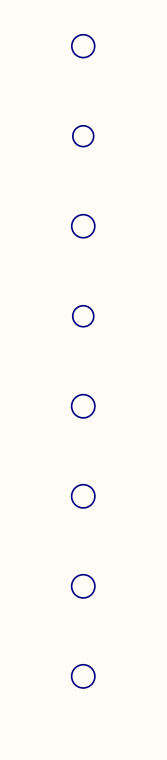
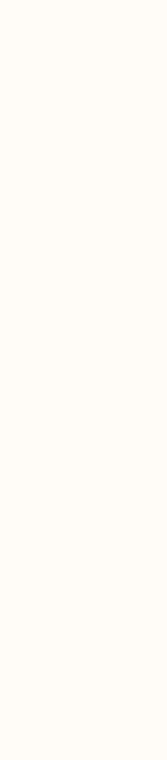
drawing: [71, 34, 95, 58] -> none
drawing: [72, 125, 94, 147] -> none
drawing: [71, 214, 95, 238] -> none
drawing: [72, 305, 94, 327] -> none
drawing: [71, 394, 95, 418] -> none
drawing: [71, 484, 95, 508] -> none
drawing: [71, 574, 95, 598] -> none
drawing: [71, 664, 95, 688] -> none

